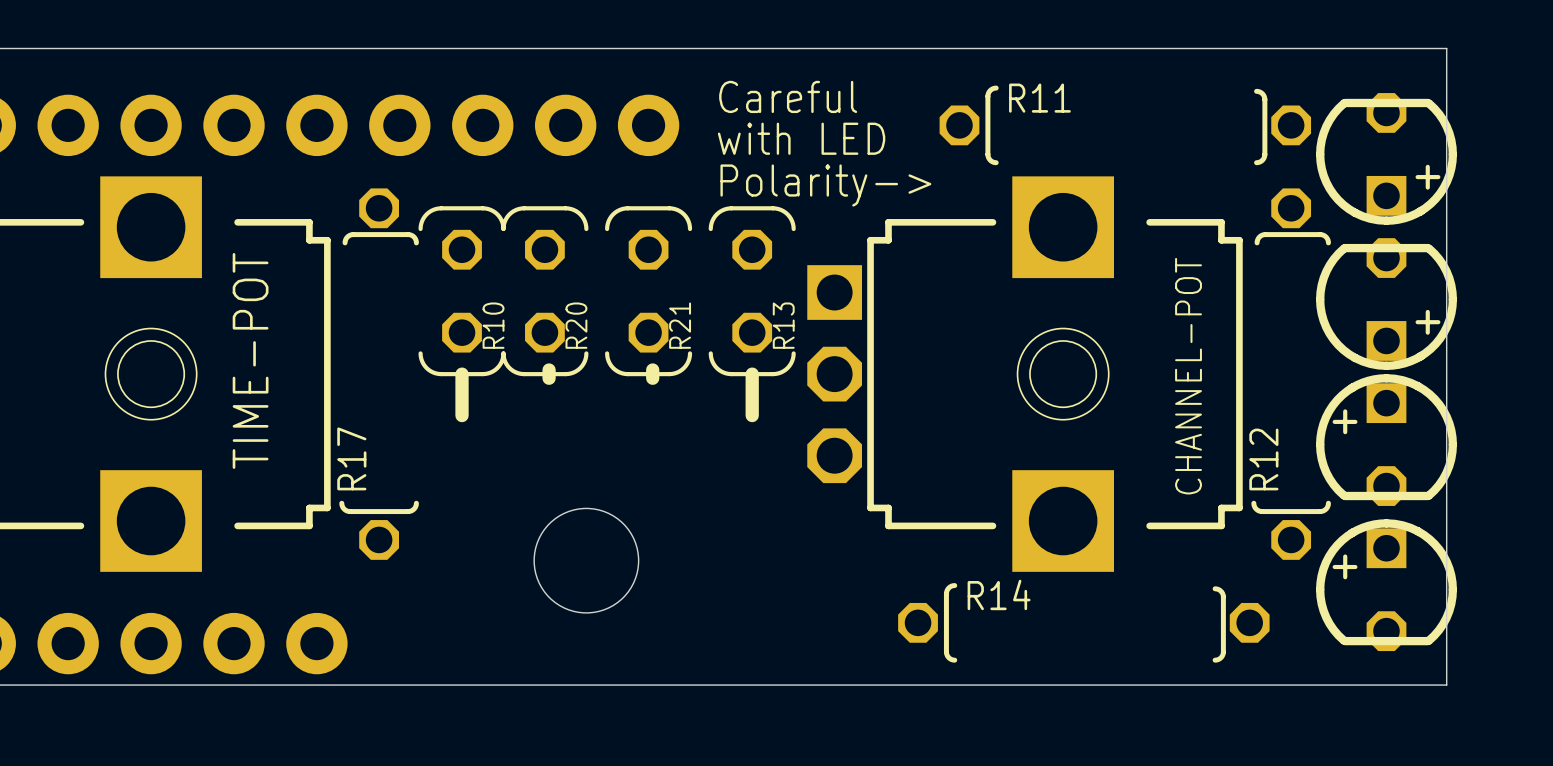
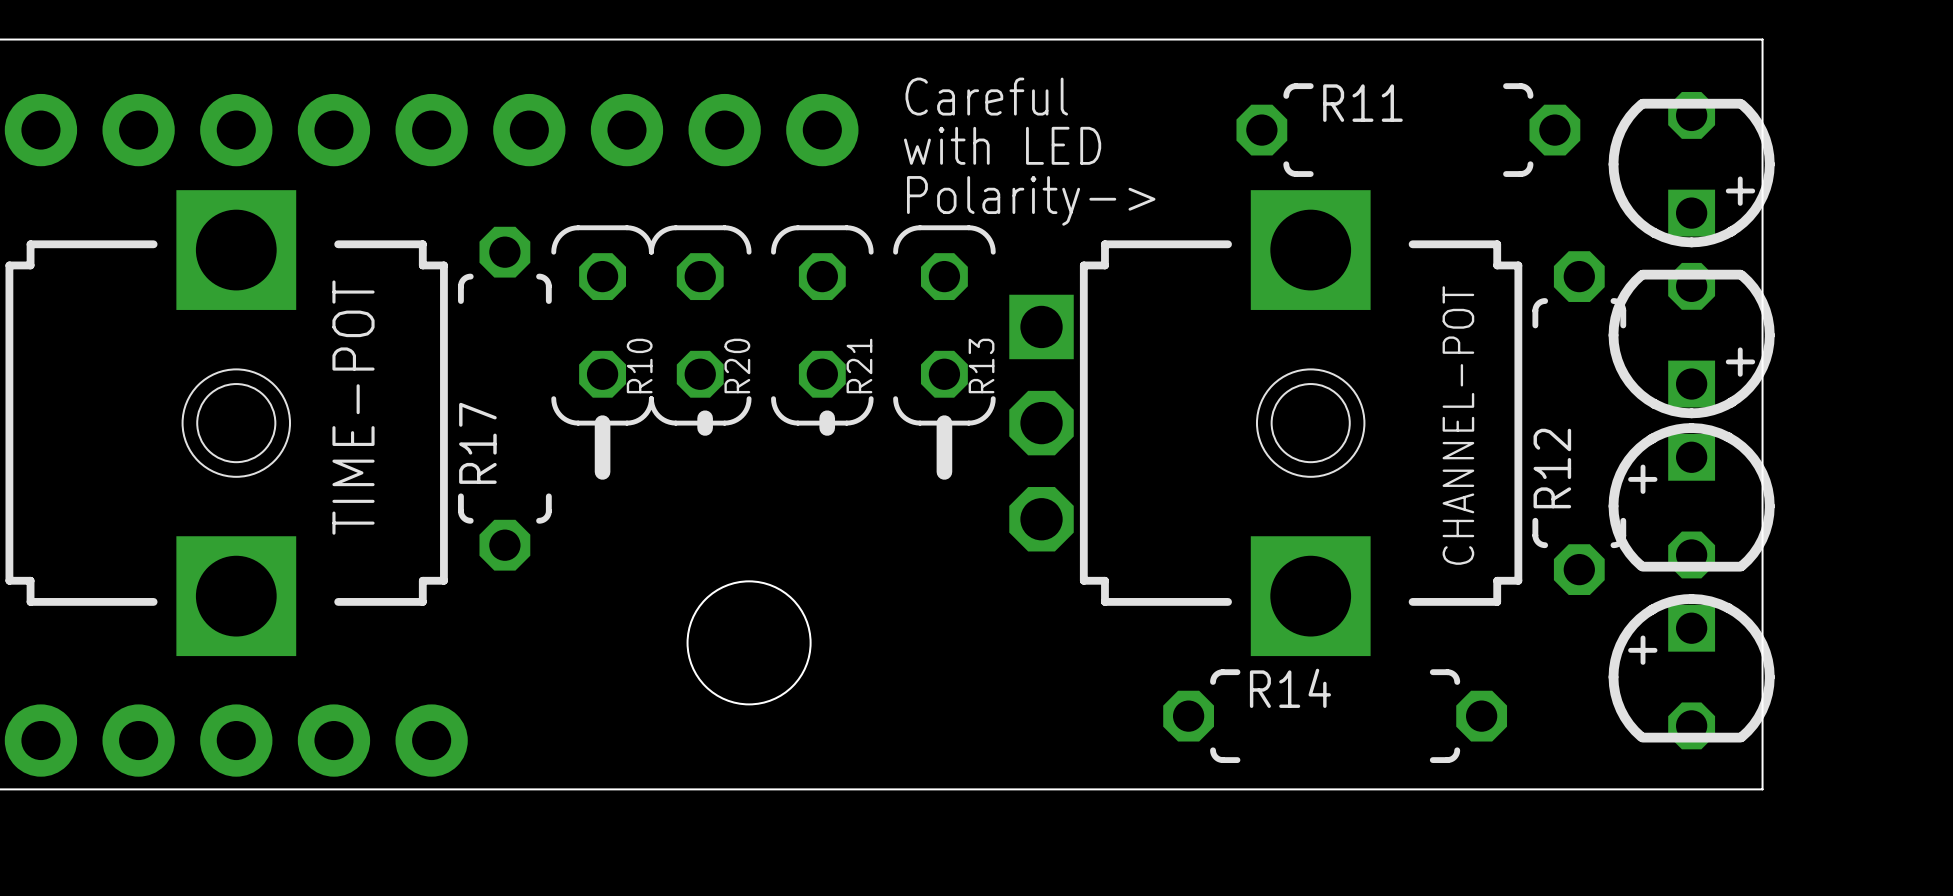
R11 footprint: [939, 85, 1312, 166] -> [1236, 83, 1581, 177]
R17 footprint: [339, 188, 419, 560] -> [458, 226, 552, 571]
R12 footprint: [1251, 188, 1331, 560] -> [1532, 251, 1627, 596]
R14 footprint: [898, 583, 1270, 663] -> [1163, 669, 1508, 764]

